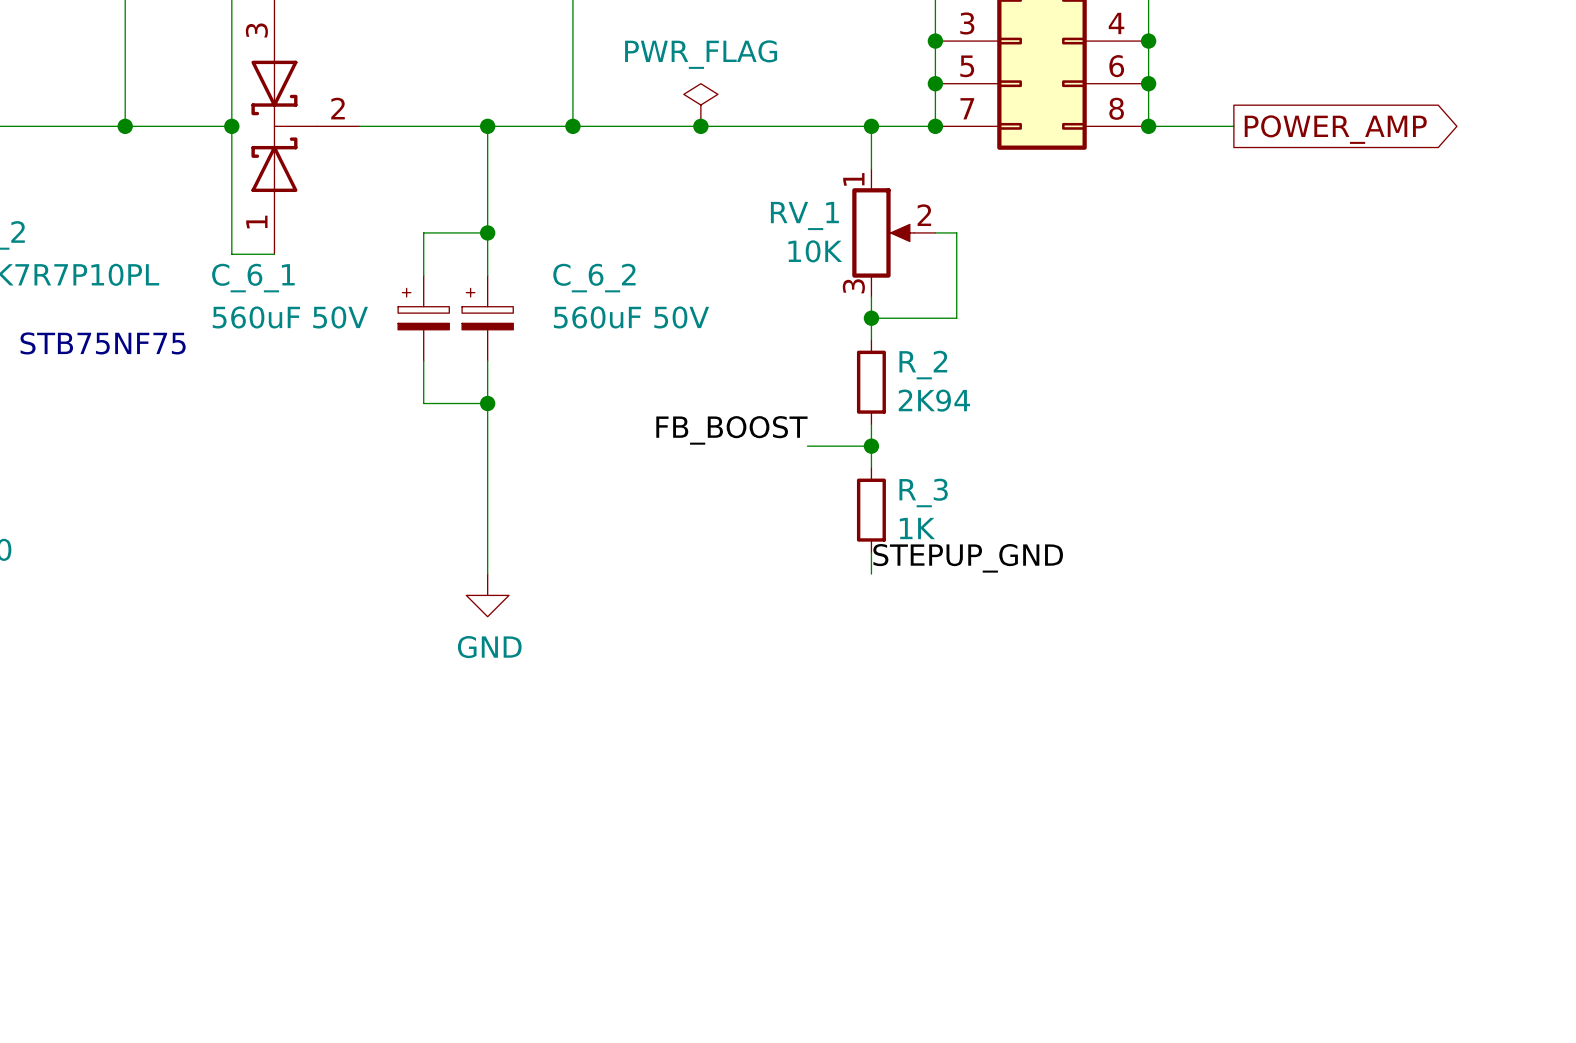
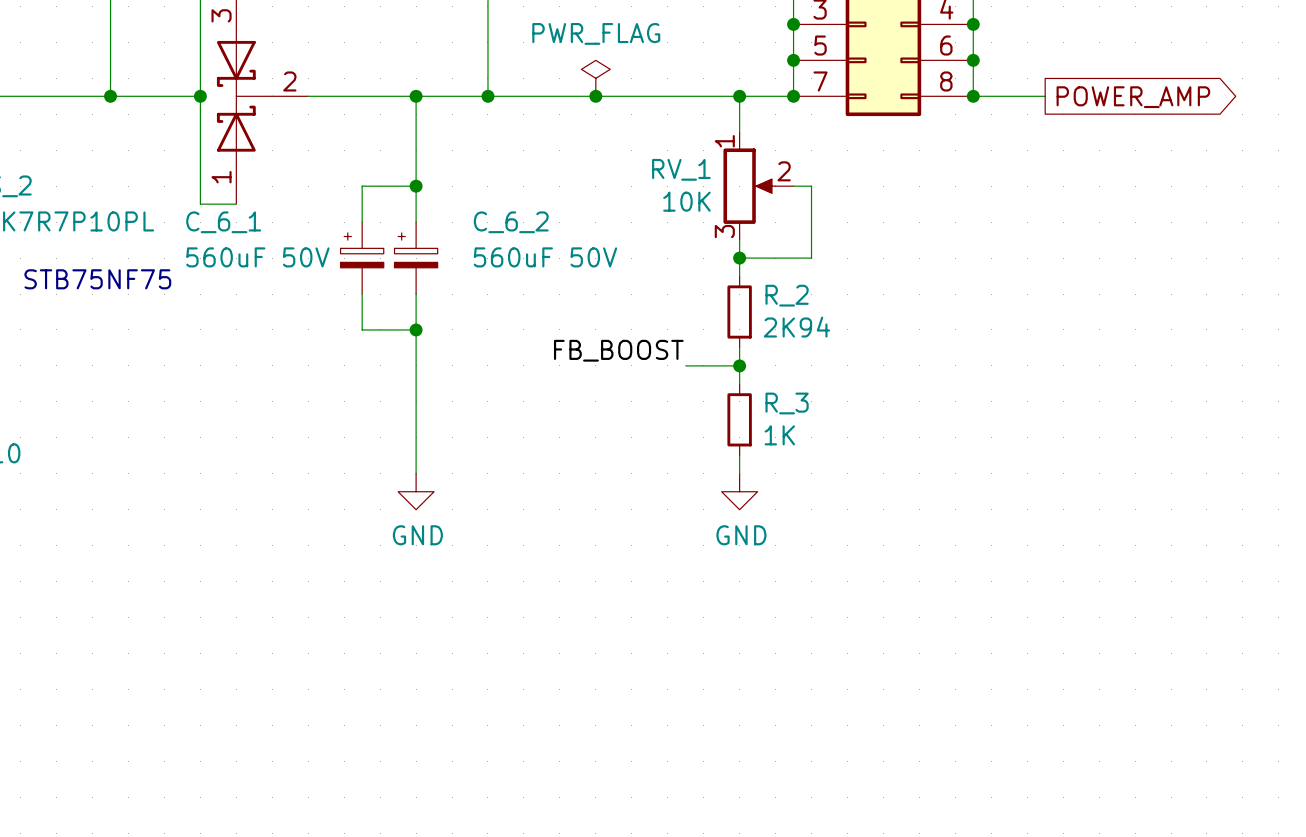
label: STEPUP_GND (968, 558) -> none
power symbol: none -> GND (739, 491)

